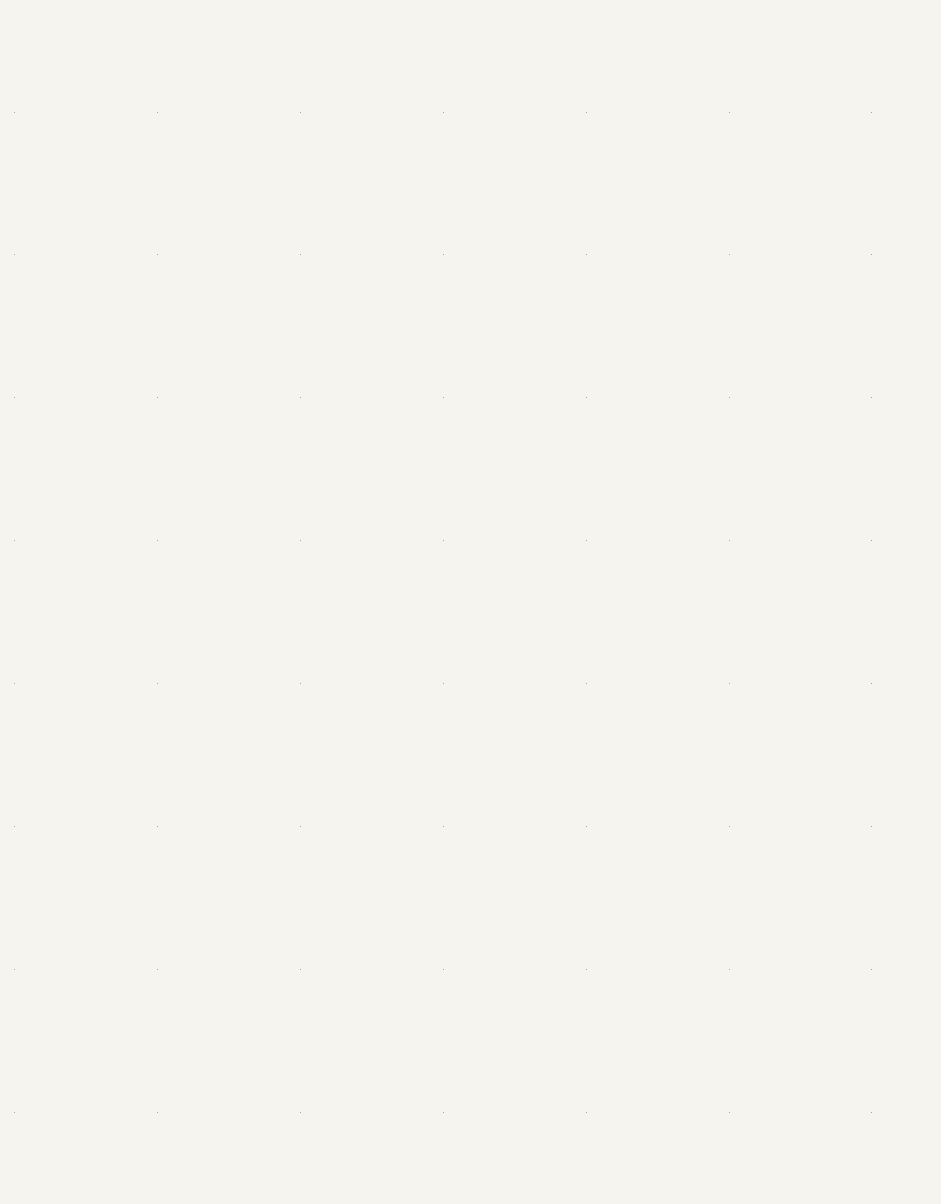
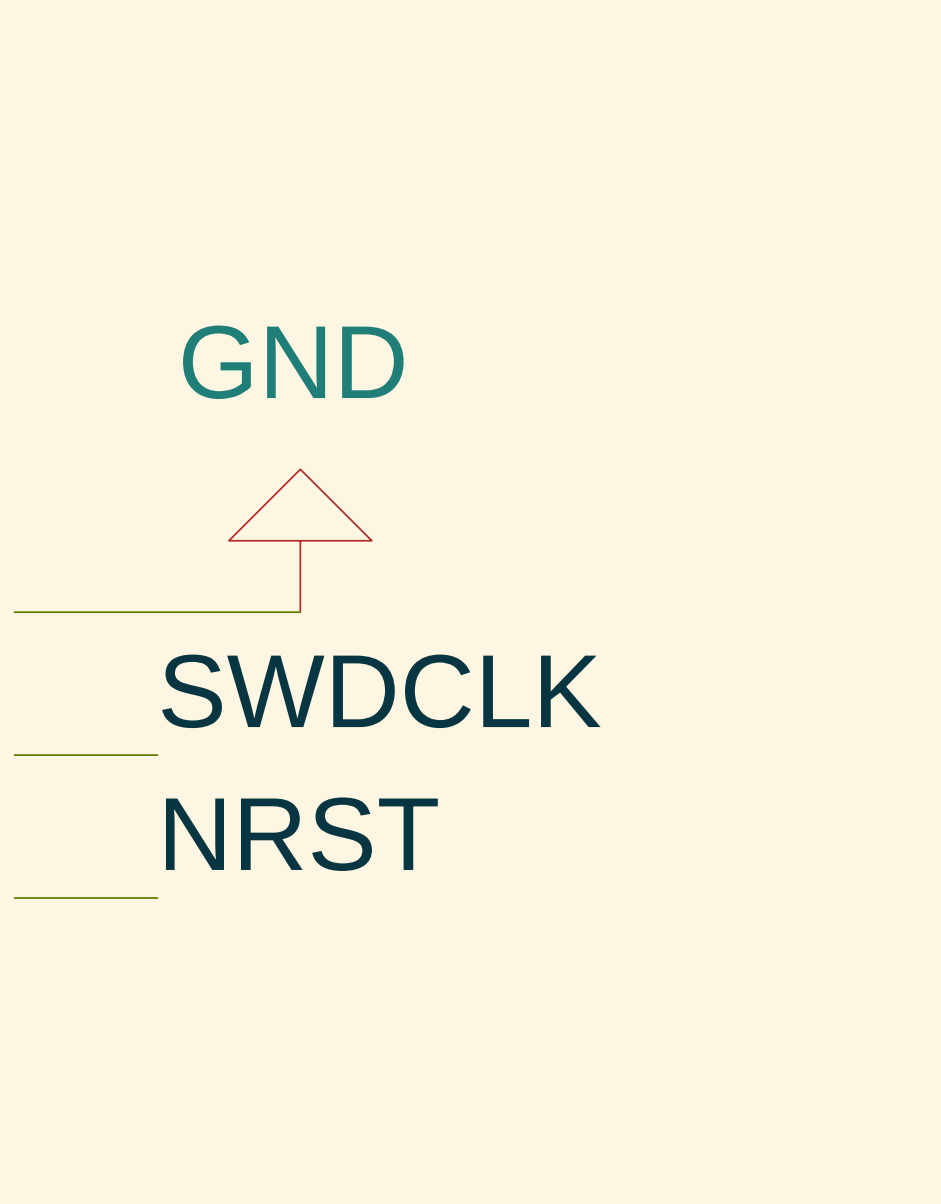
power symbol: none -> GND (300, 540)
wire: none -> (14, 612) (300, 612)
label: none -> SWDCLK (381, 691)
wire: none -> (14, 755) (157, 755)
label: none -> NRST (301, 834)
wire: none -> (14, 898) (157, 898)

